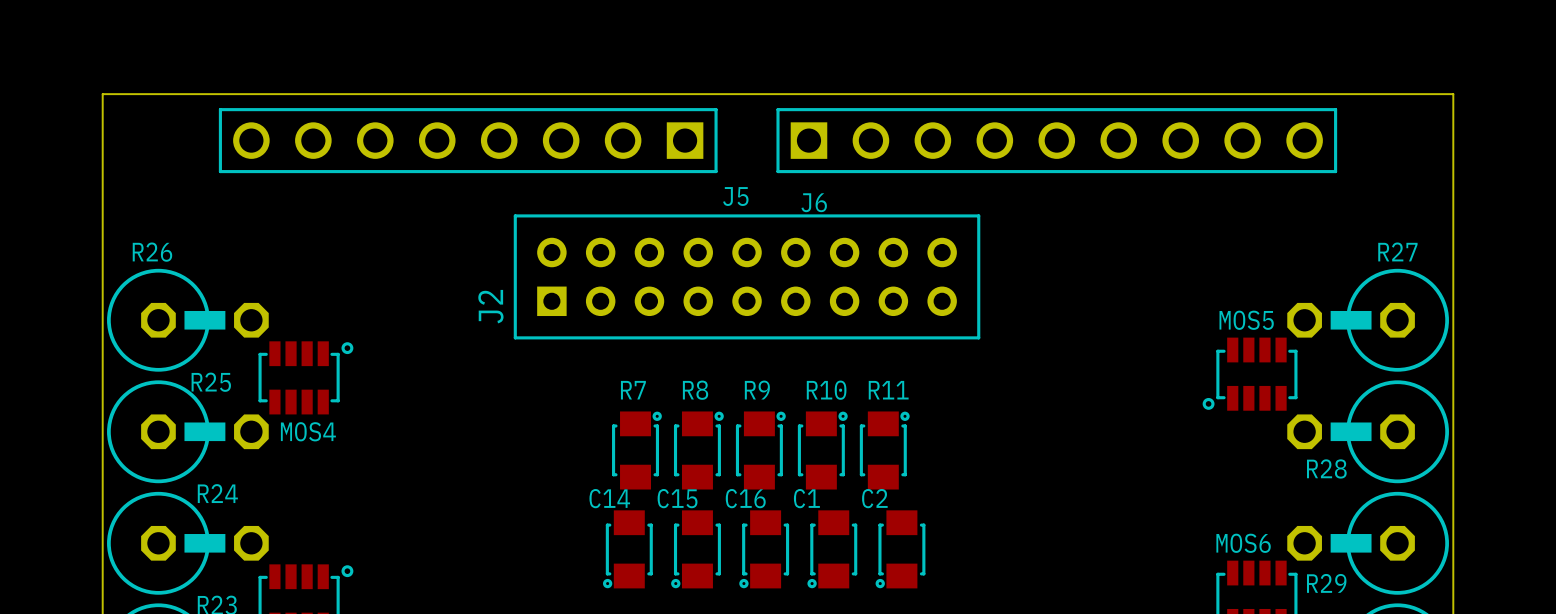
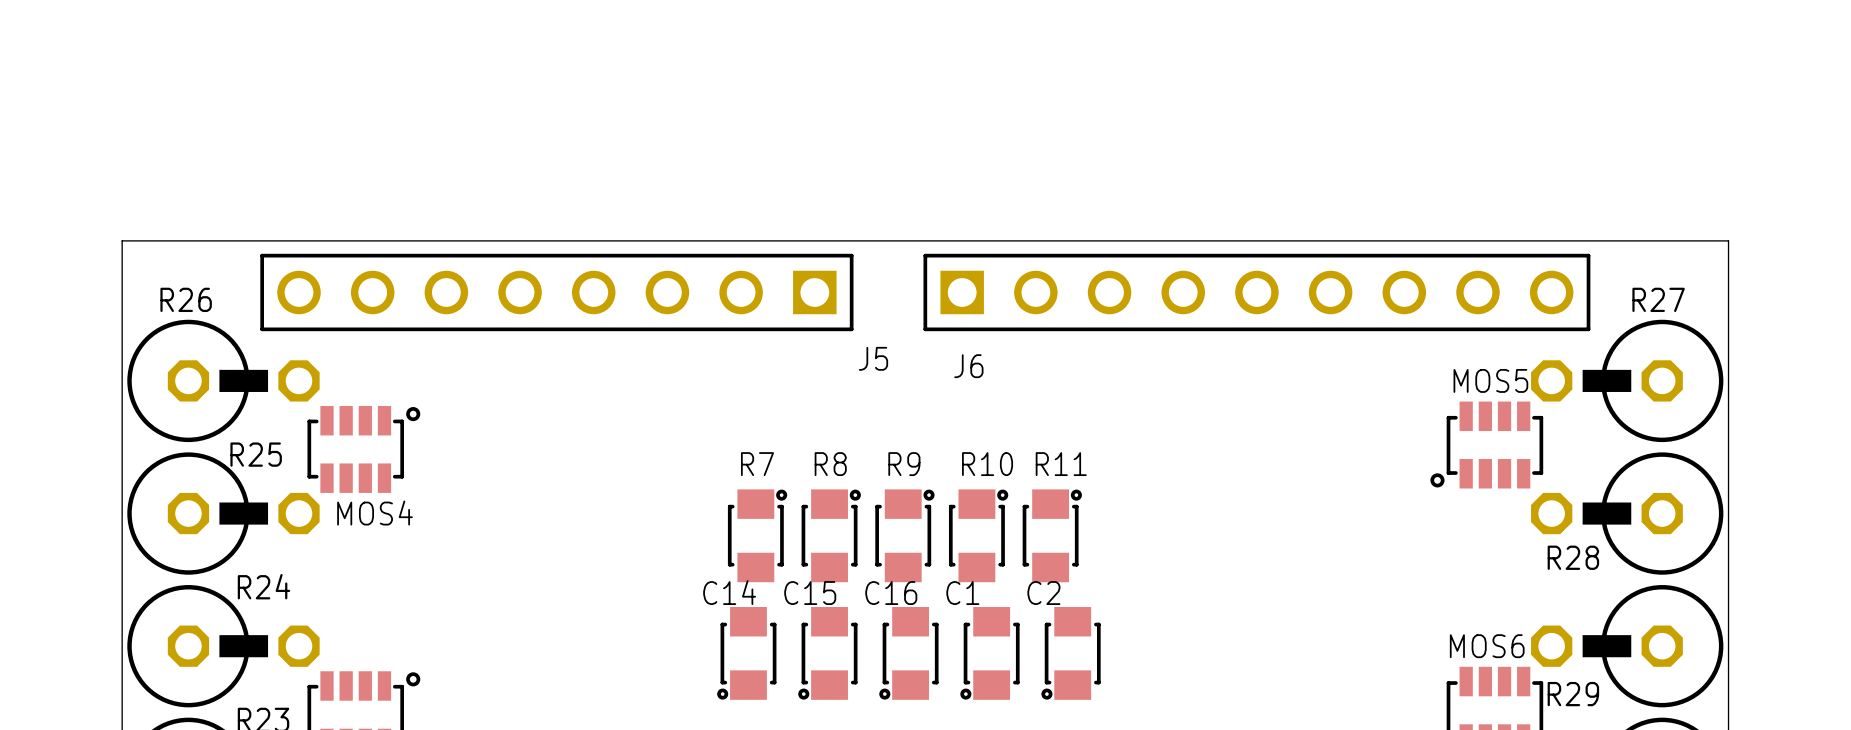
J5 position: (468, 140) -> (556, 292)
J6 position: (1056, 140) -> (1256, 292)
board edge: (102, 202) (102, 94) (1453, 94) (1453, 202) -> (122, 240) (1728, 240)
J2: (747, 276) -> none

